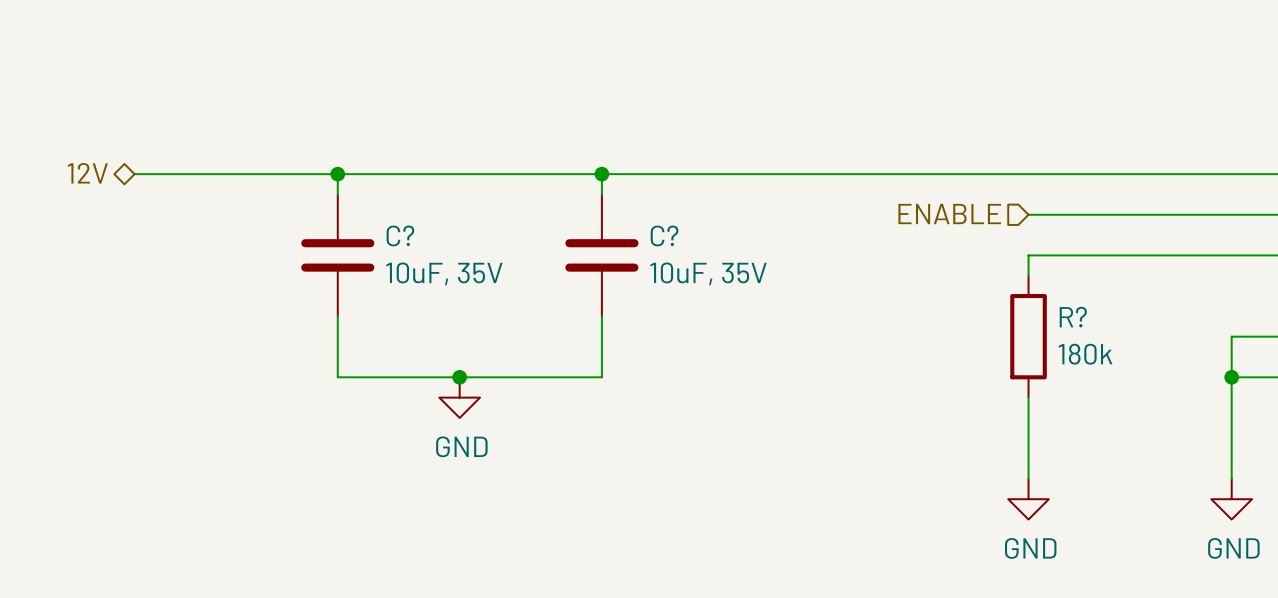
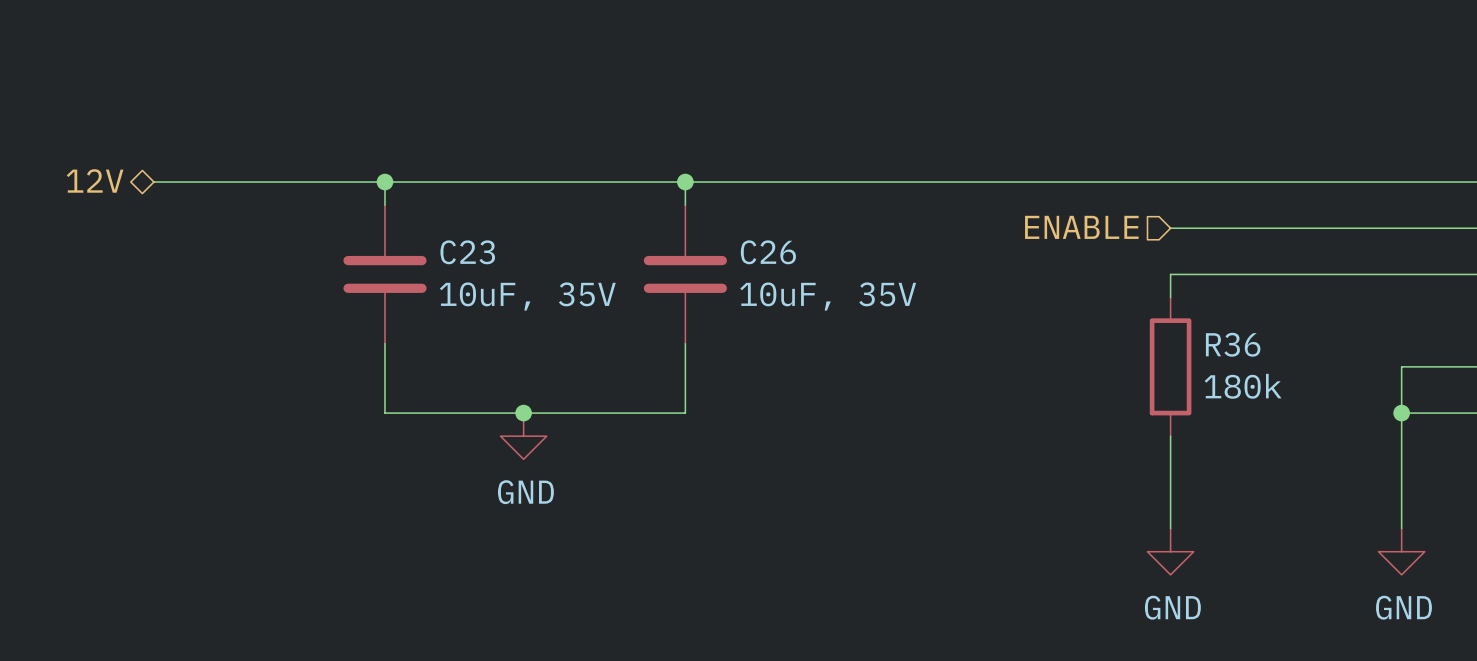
C? name: C? (400, 235) -> C23 (467, 252)
C? name: C? (664, 235) -> C26 (768, 252)
R? name: R? (1073, 317) -> R36 (1233, 344)

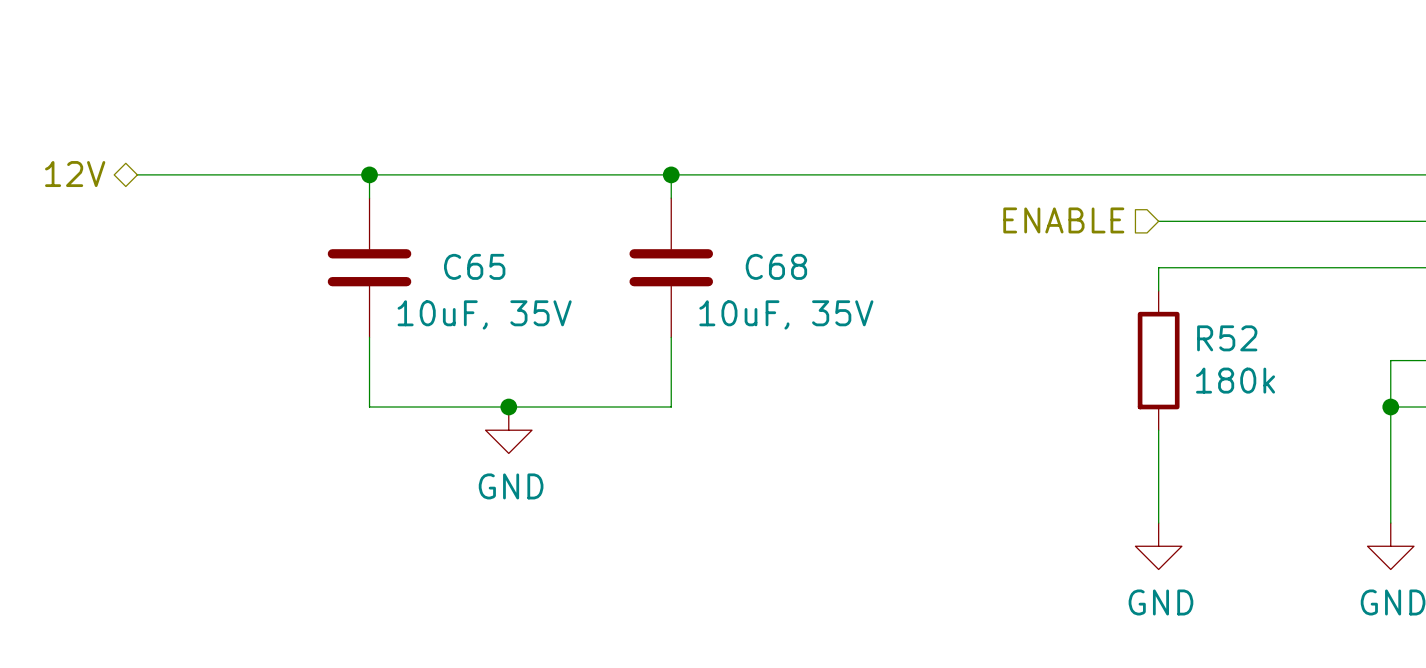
C23 name: C23 (467, 252) -> C65 (474, 266)
C26 name: C26 (768, 252) -> C68 (776, 266)
C23 value position: 10uF, 35V (527, 296) -> 10uF, 35V (484, 314)
C26 value position: 10uF, 35V (828, 296) -> 10uF, 35V (786, 314)
R36 name: R36 (1233, 344) -> R52 (1227, 338)

